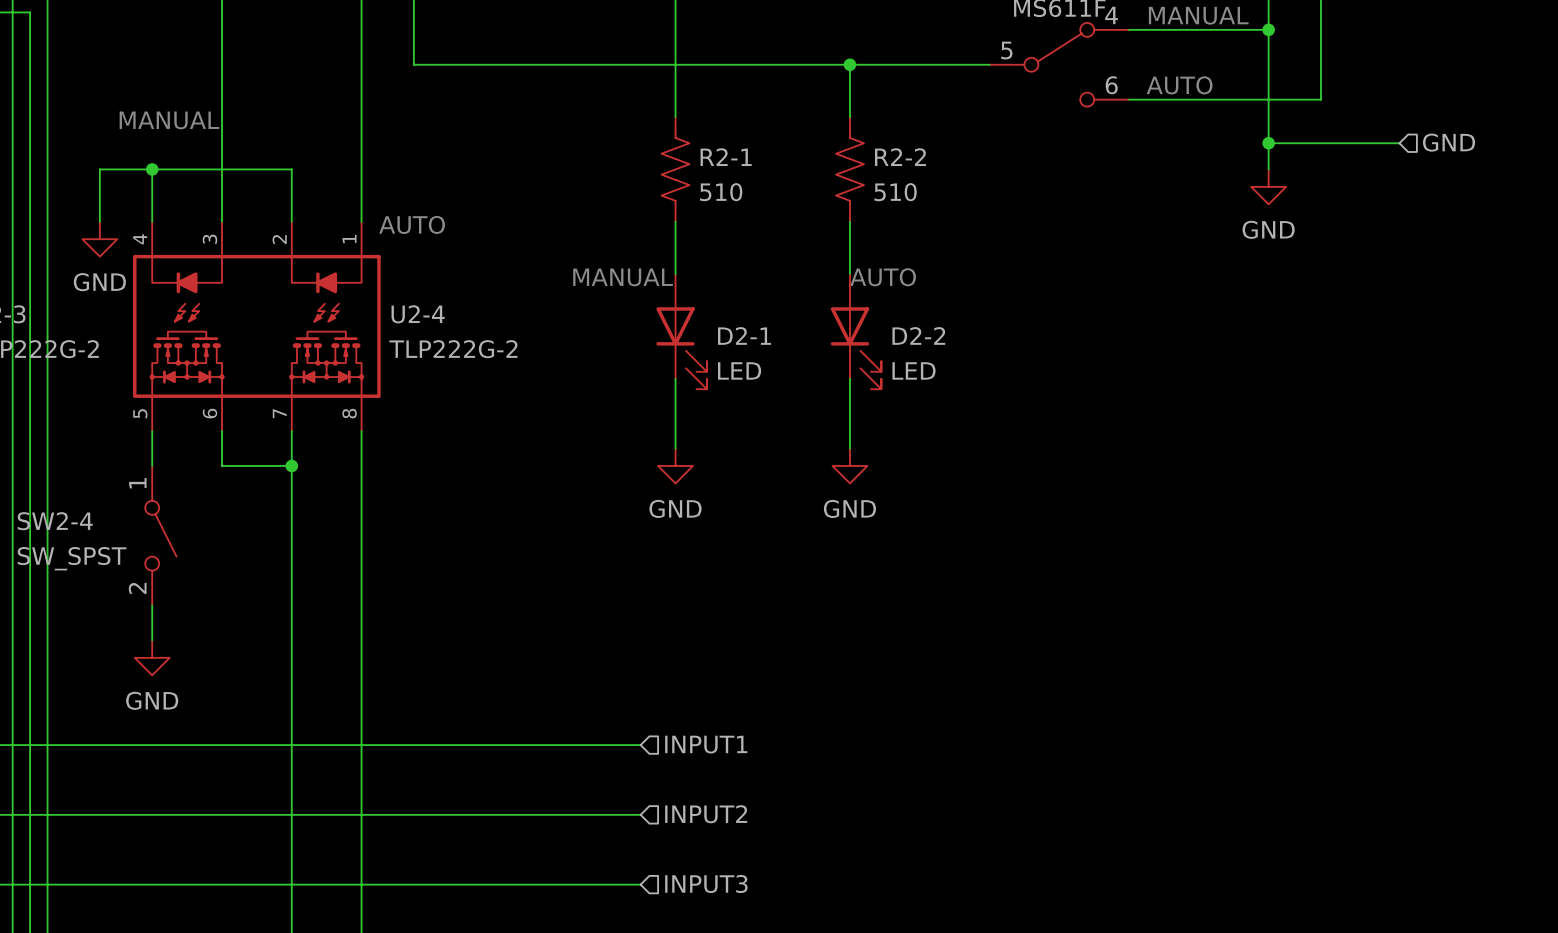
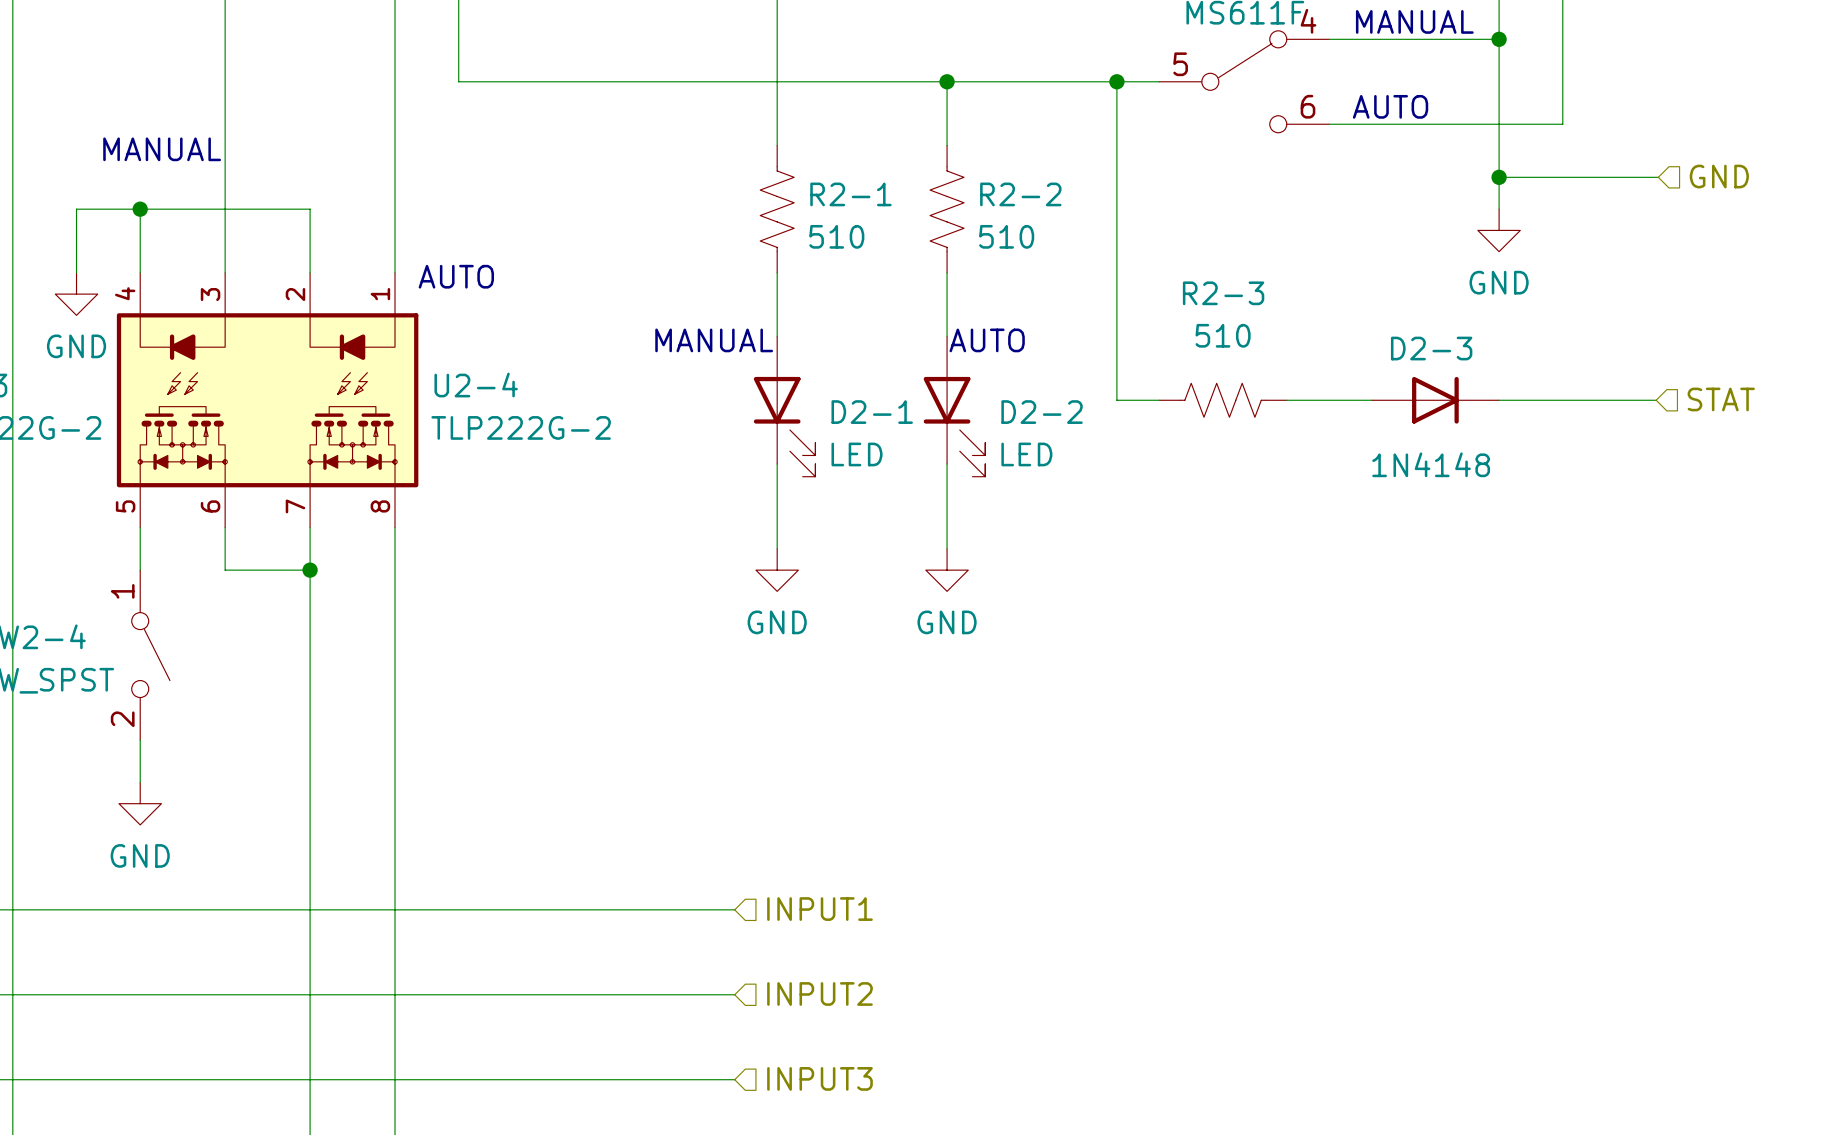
wire: (849, 64) (849, 117) -> (947, 81) (947, 145)
junction position: (849, 64) -> (947, 81)
wire: none -> (1116, 81) (1116, 400) (1159, 400)
junction: none -> (1116, 81)
R2-2 position: (849, 169) -> (947, 209)
wire: (849, 221) (849, 274) -> (947, 272) (947, 336)
text position: AUTO (883, 277) -> AUTO (987, 340)
hierarchical label: none -> STAT (1721, 399)
R2-3: none -> 510 (1223, 400)
wire: none -> (1286, 400) (1371, 400)
D2-3: none -> 1N4148 (1435, 400)
wire: none -> (1499, 400) (1656, 400)
D2-2 position: (856, 331) -> (954, 406)
wire: (849, 378) (849, 448) -> (947, 463) (947, 548)
power symbol position: GND (849, 465) -> GND (947, 570)

